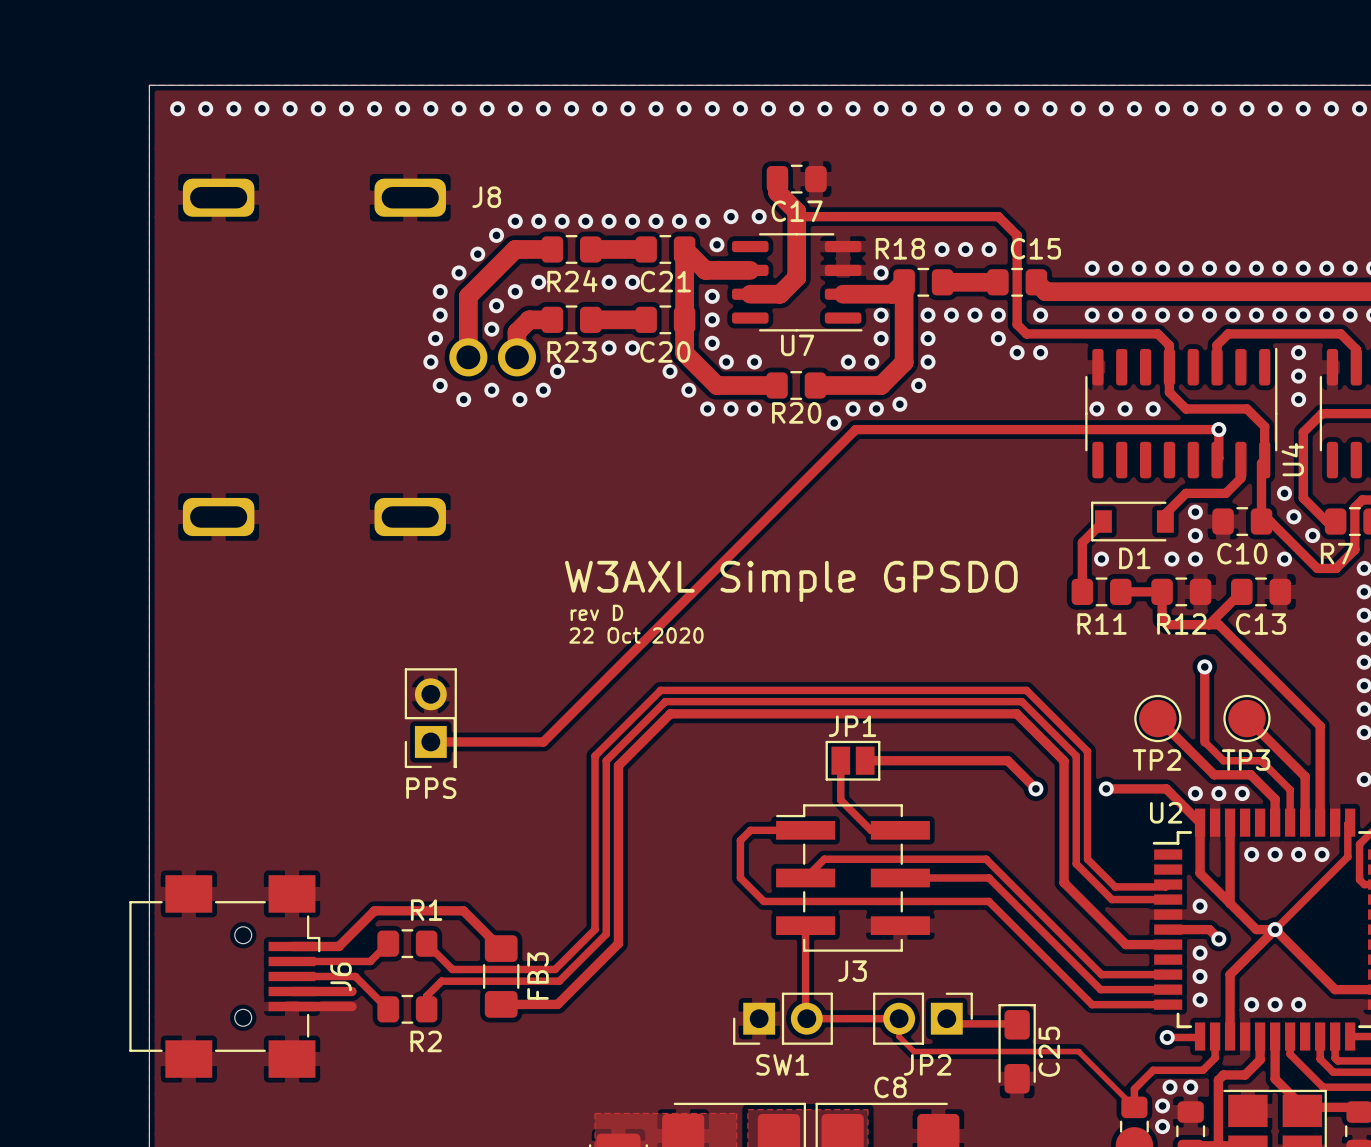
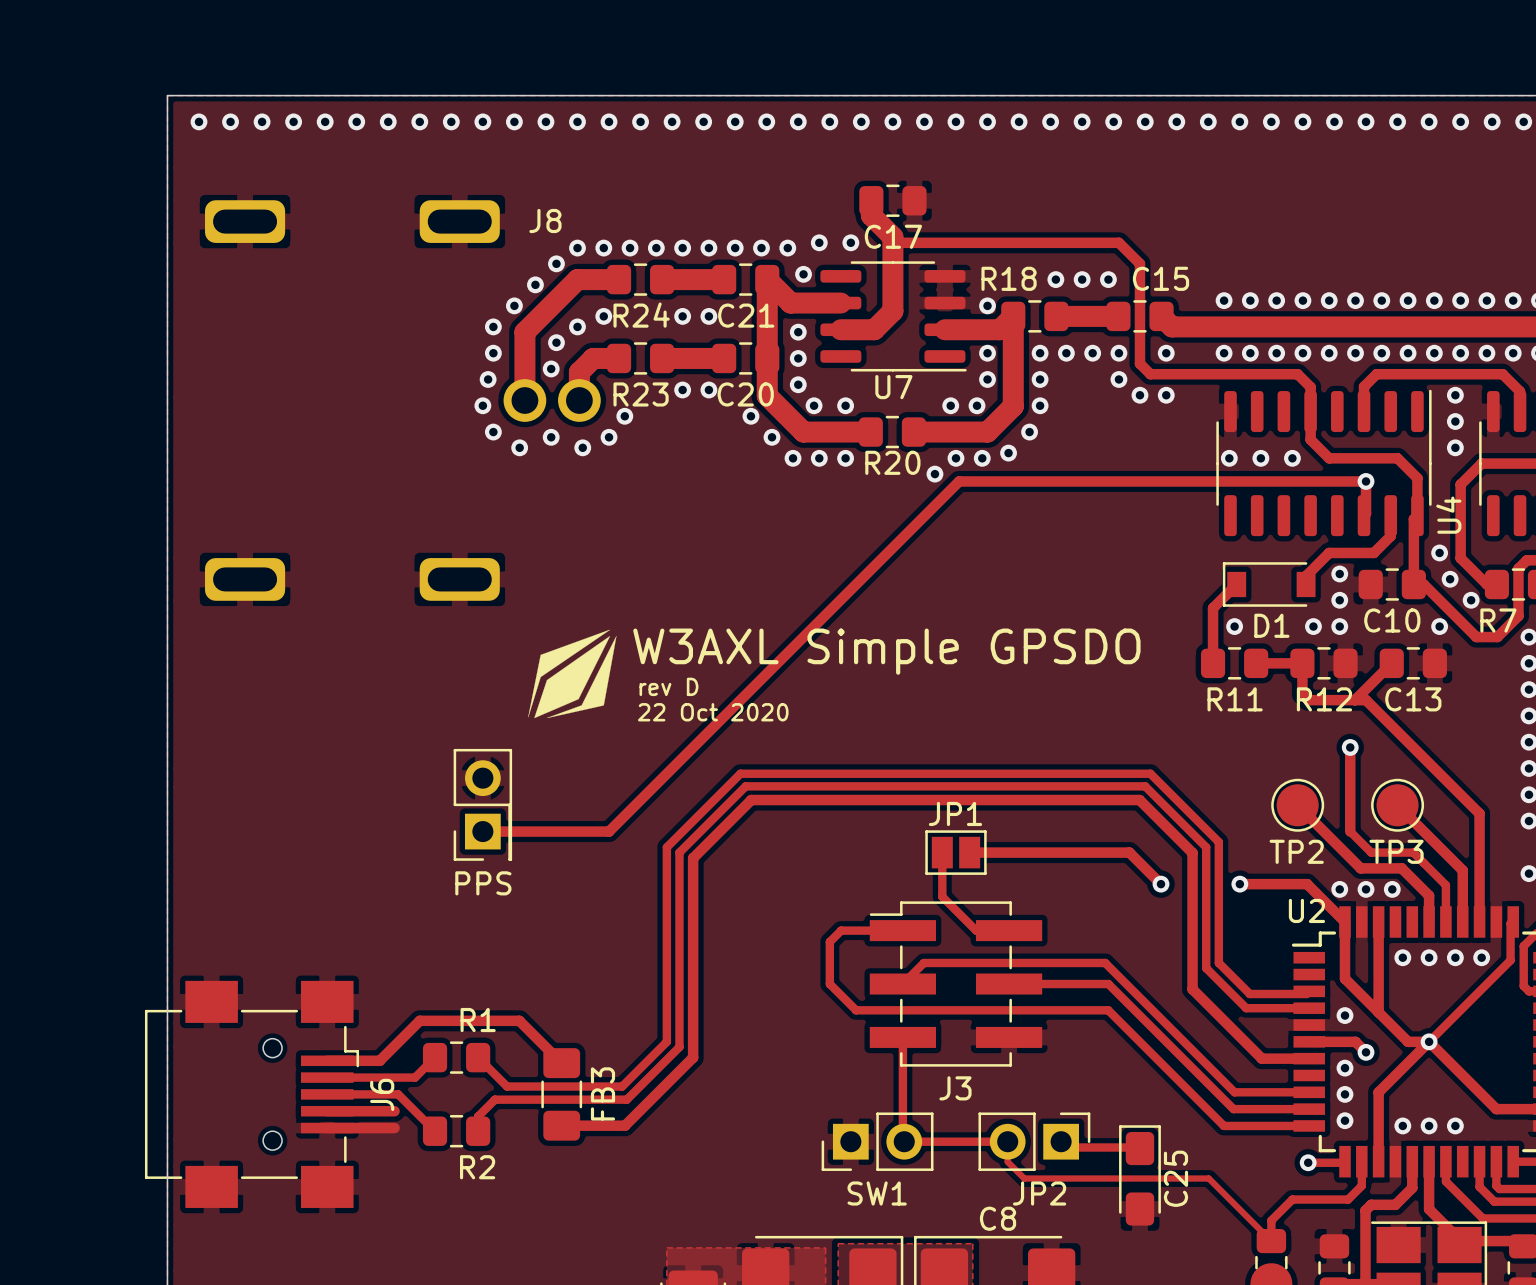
drawing: none -> [528, 629, 617, 719]
via: (1170, 1087) -> none
via: (1190, 1087) -> none
via: (1162, 1105) -> none
via: (1162, 1126) -> none

